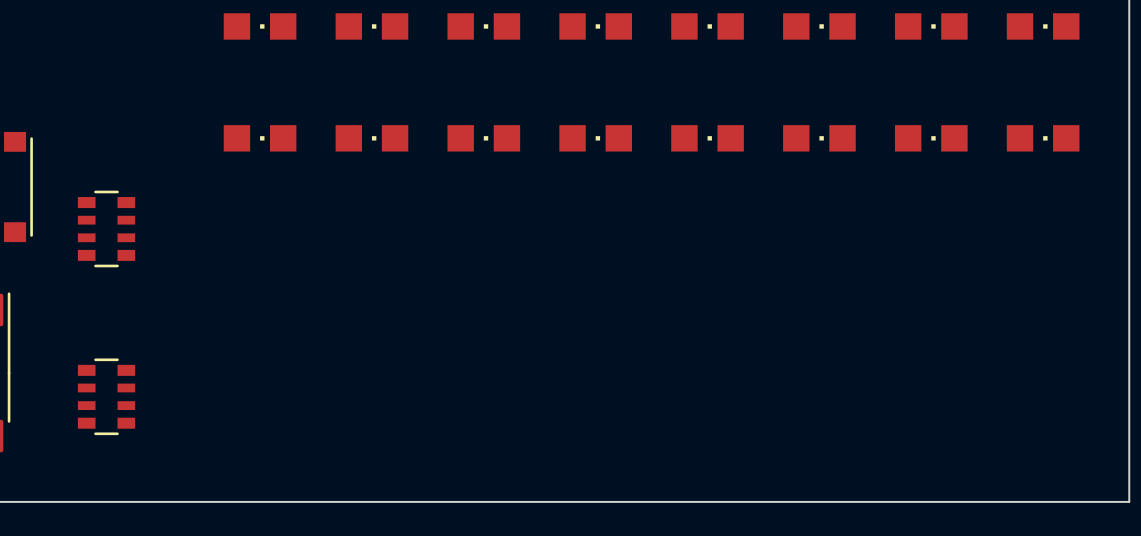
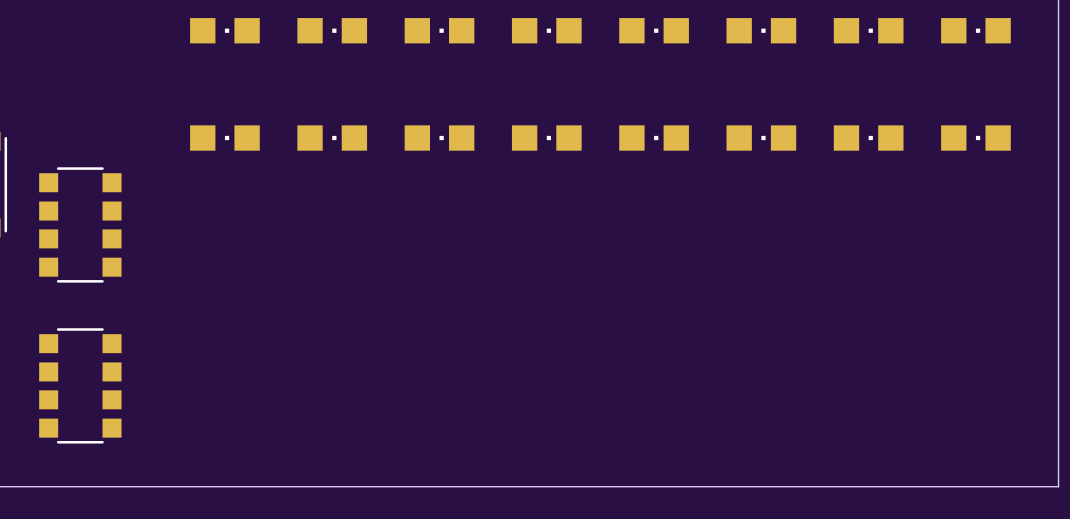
part footprint: [77, 190, 136, 268] -> [39, 167, 122, 283]
part footprint: [77, 358, 136, 436] -> [39, 328, 122, 444]

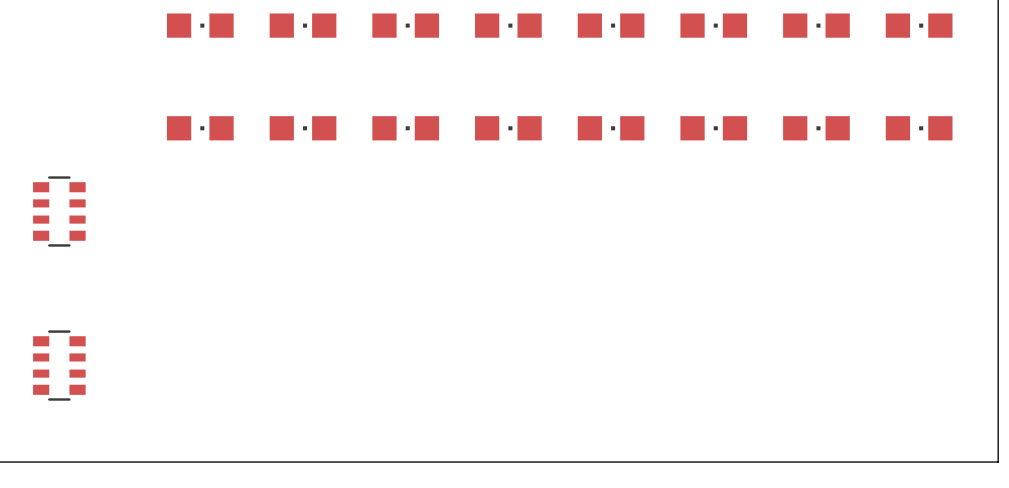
part footprint: [39, 167, 122, 283] -> [33, 176, 86, 247]
part footprint: [39, 328, 122, 444] -> [33, 330, 86, 401]

